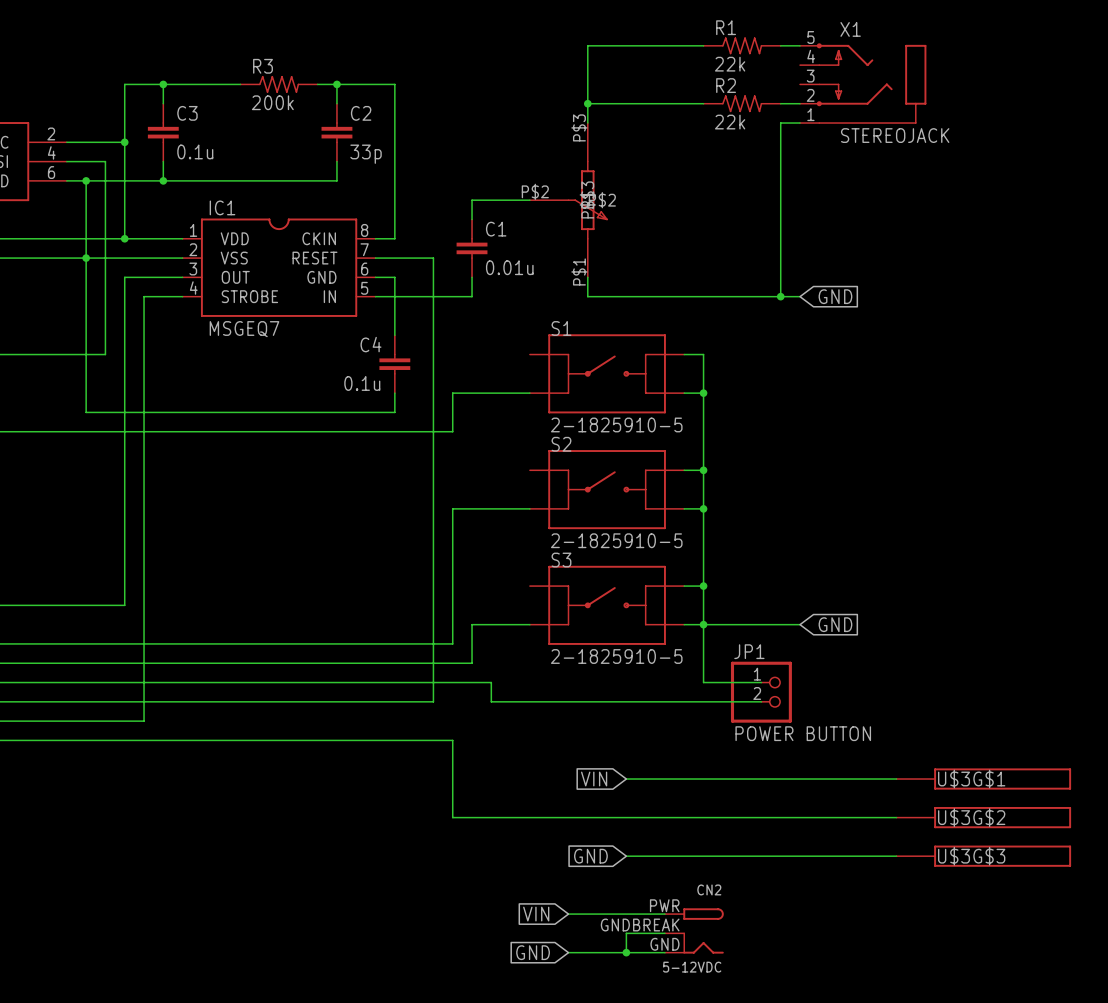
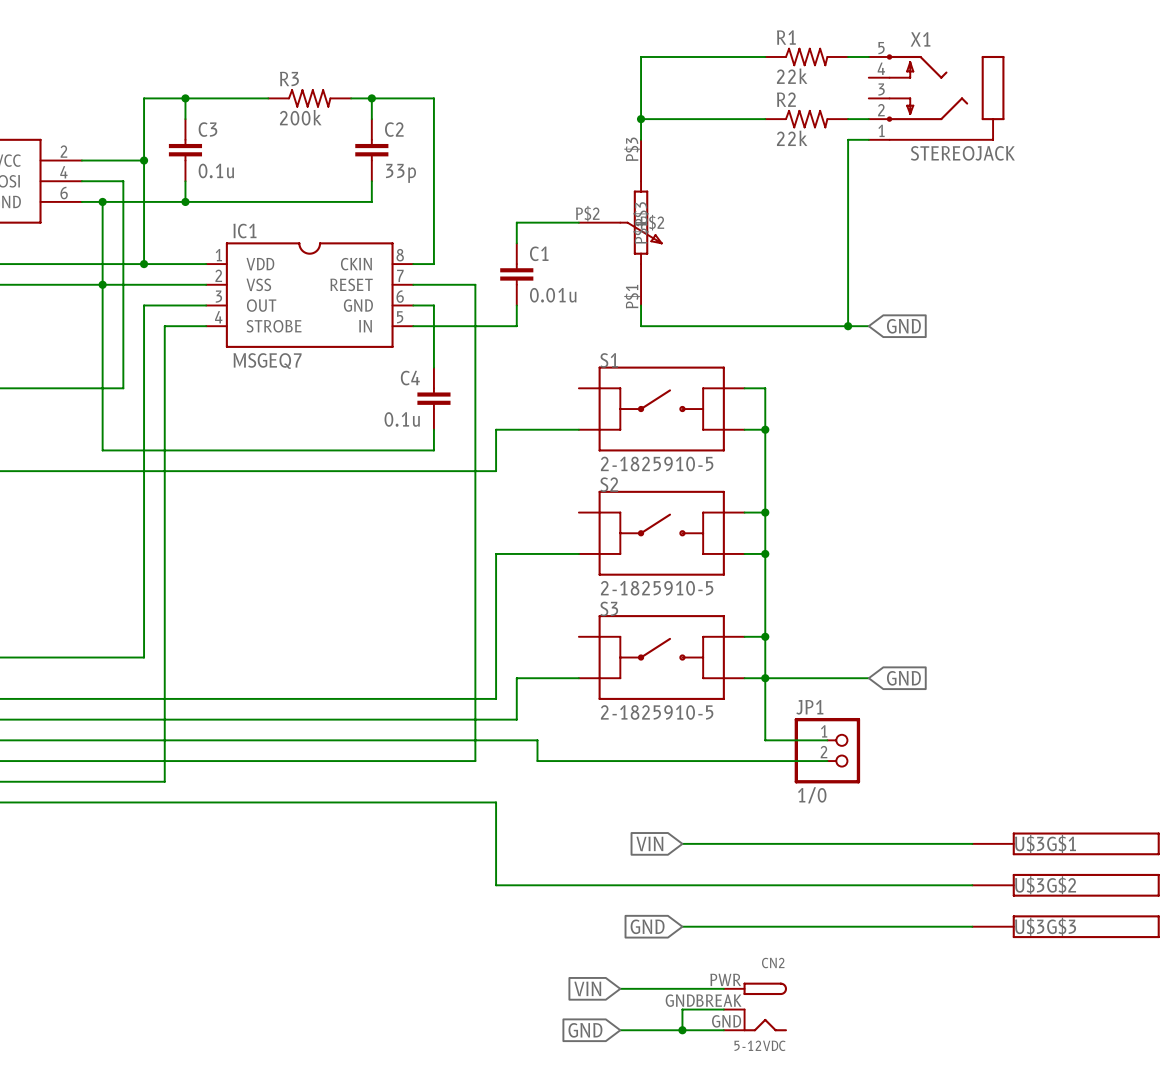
JP1 value: POWER BUTTON (803, 733) -> 1/0 (812, 795)

